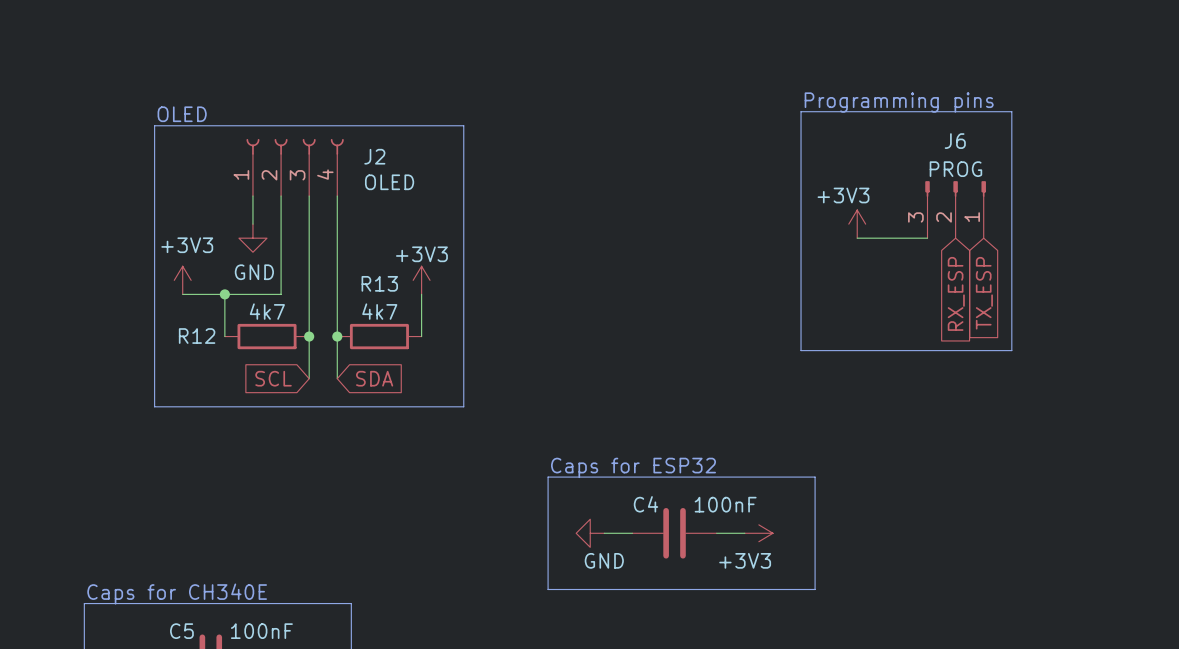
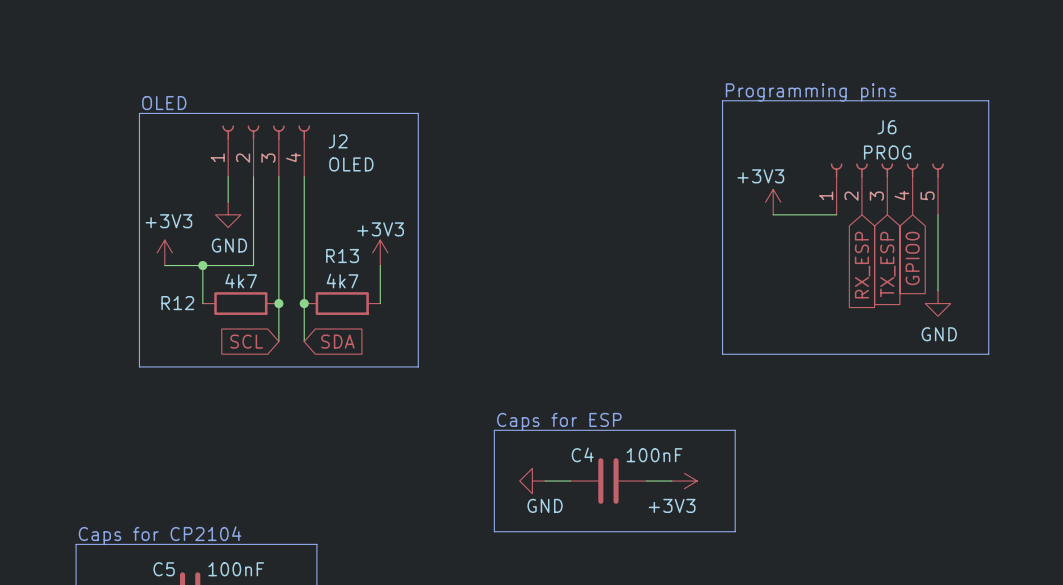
line: (1011, 111) (1011, 350) (801, 350) -> (912, 100) (988, 100) (988, 354) (722, 354) (722, 316)
J6 symbol: [925, 181, 986, 239] -> [830, 163, 944, 215]
wire: none -> (938, 214) (938, 290)
global label: none -> GPIO0 (912, 258)
power symbol: none -> GND (938, 303)
text: Caps for ESP32 (633, 467) -> Caps for ESP (559, 422)
text: Caps for CH340E (177, 594) -> Caps for CP2104 (160, 535)

